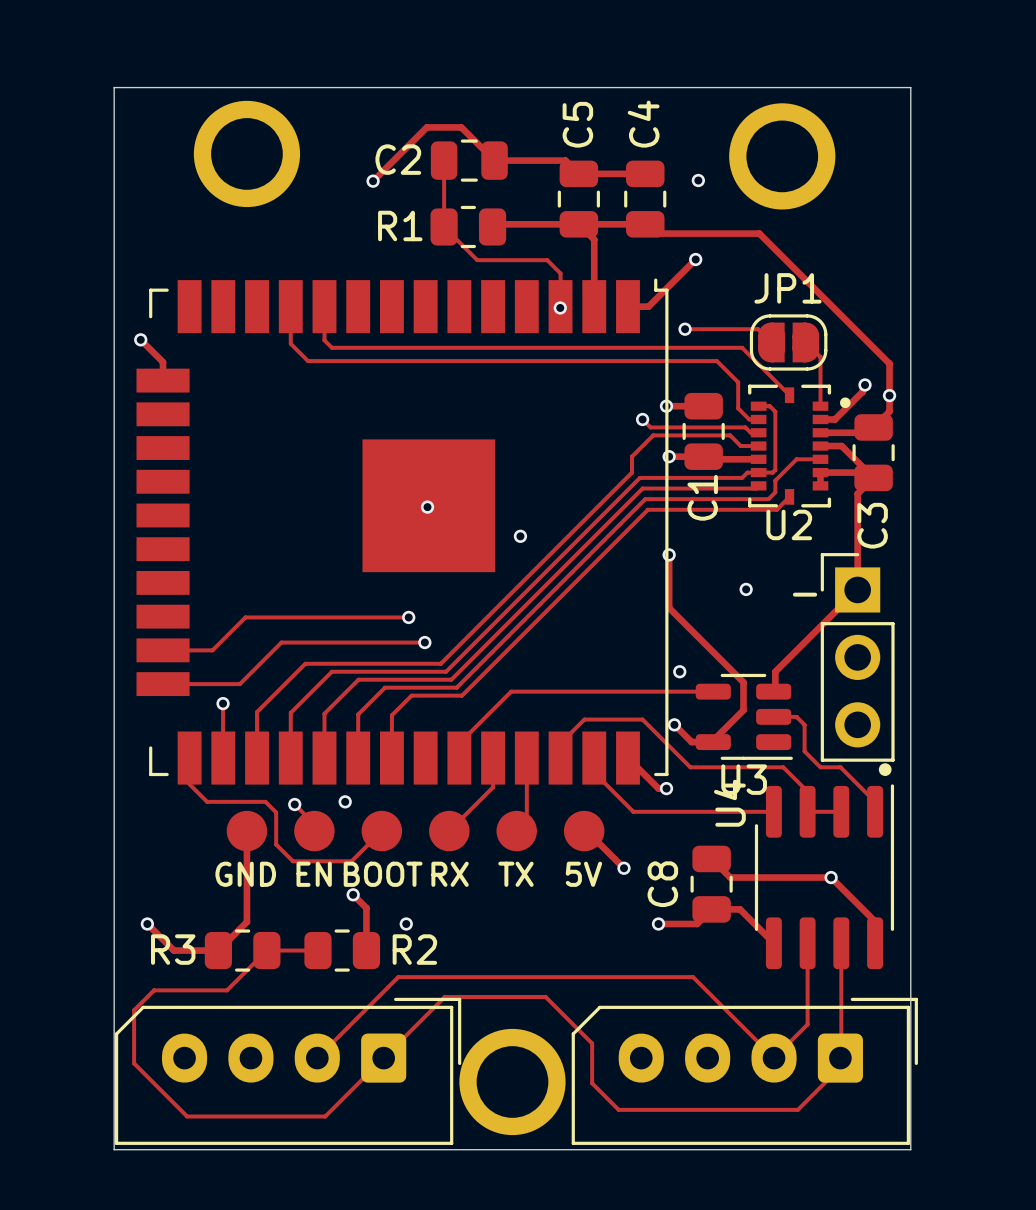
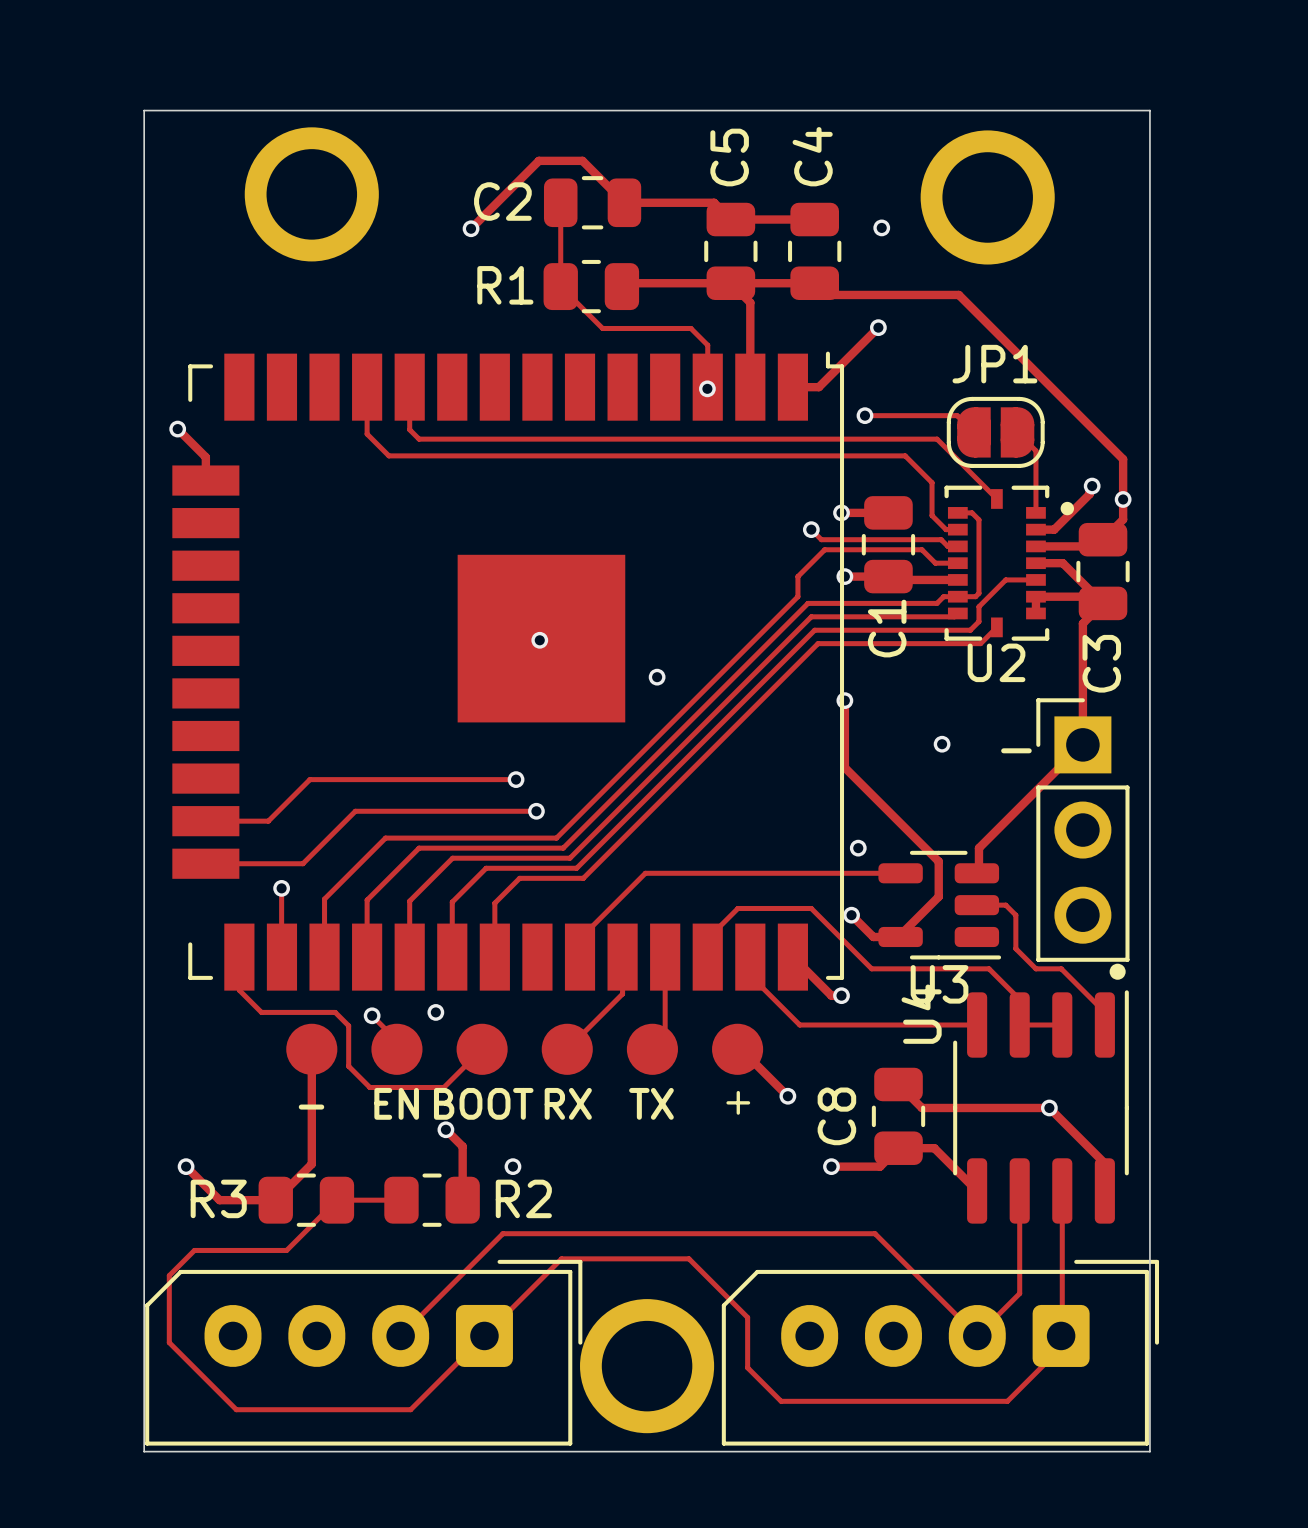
text: GND (245, 874) -> - (311, 1107)
text: 5V (583, 874) -> + (738, 1102)

